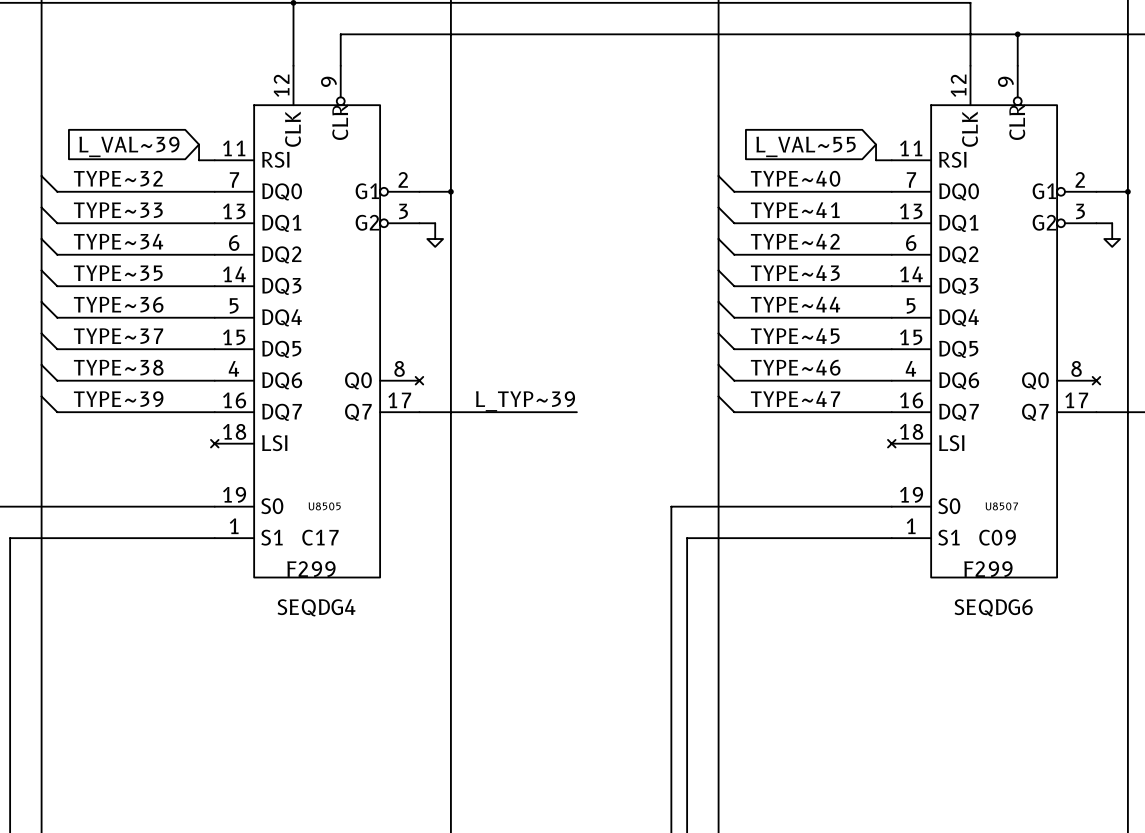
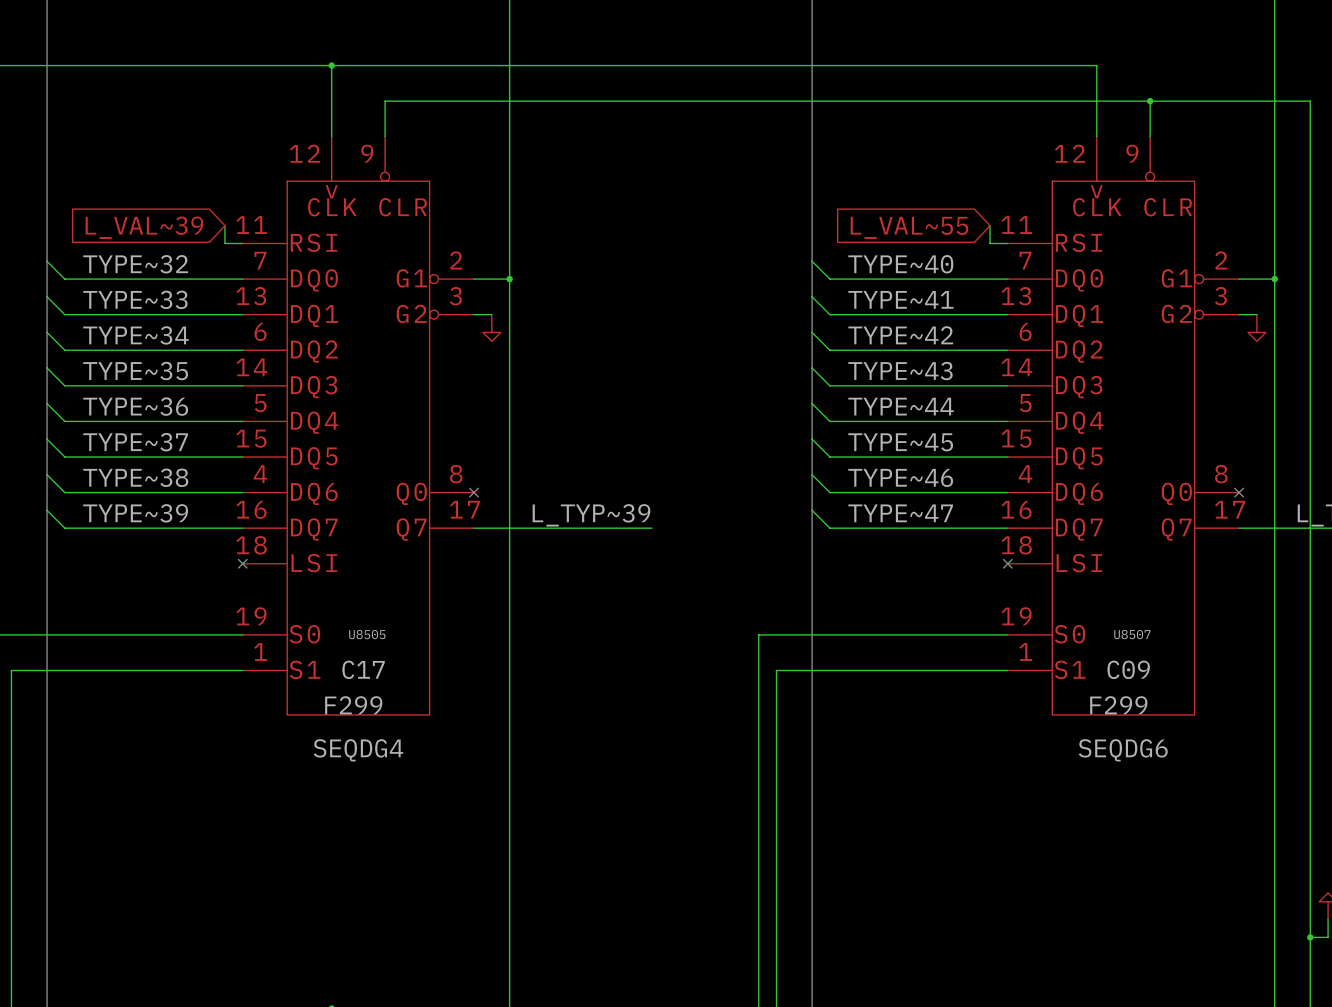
U8505 symbol: [214, 65, 420, 578] -> [242, 136, 475, 715]
U8507 symbol: [891, 65, 1097, 578] -> [1007, 136, 1240, 715]

